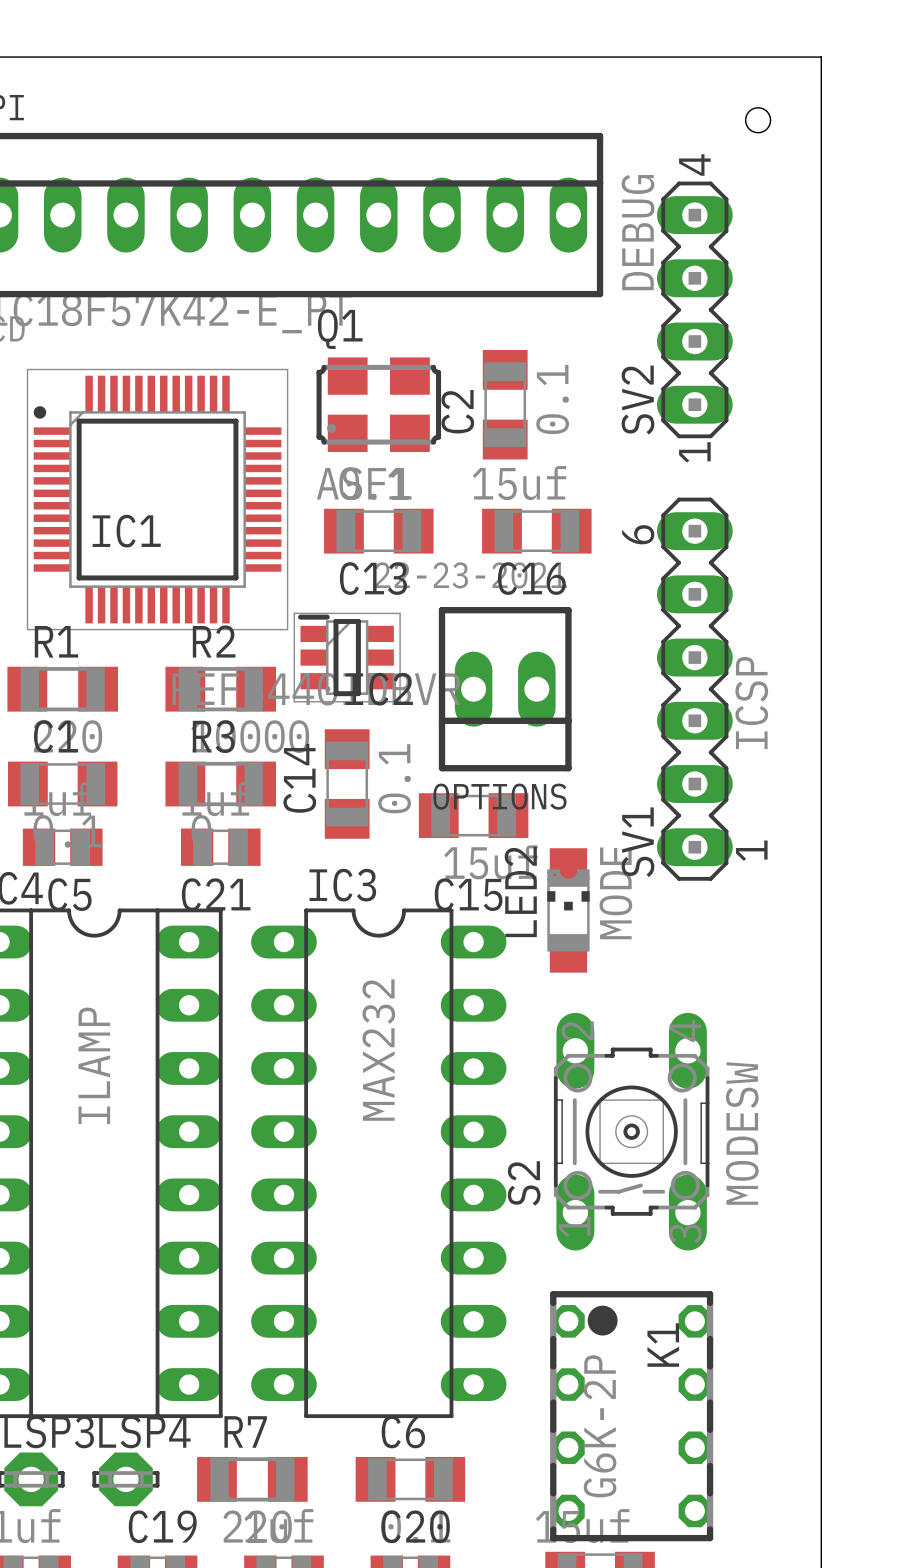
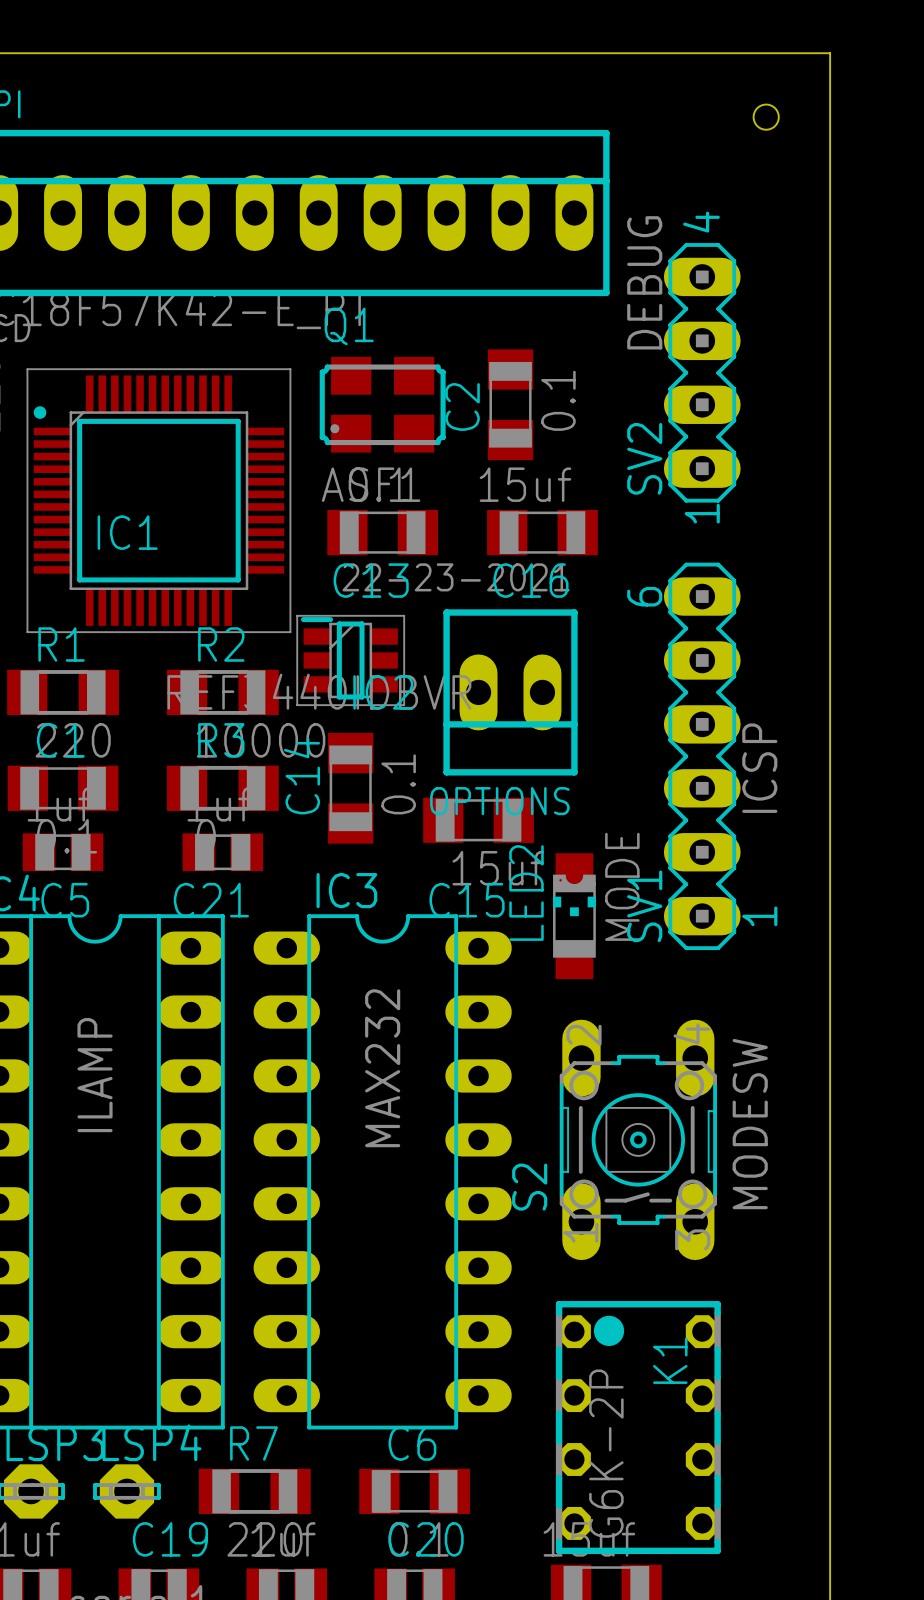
SV2 position: (694, 309) -> (702, 372)
SV1 position: (694, 689) -> (702, 756)

